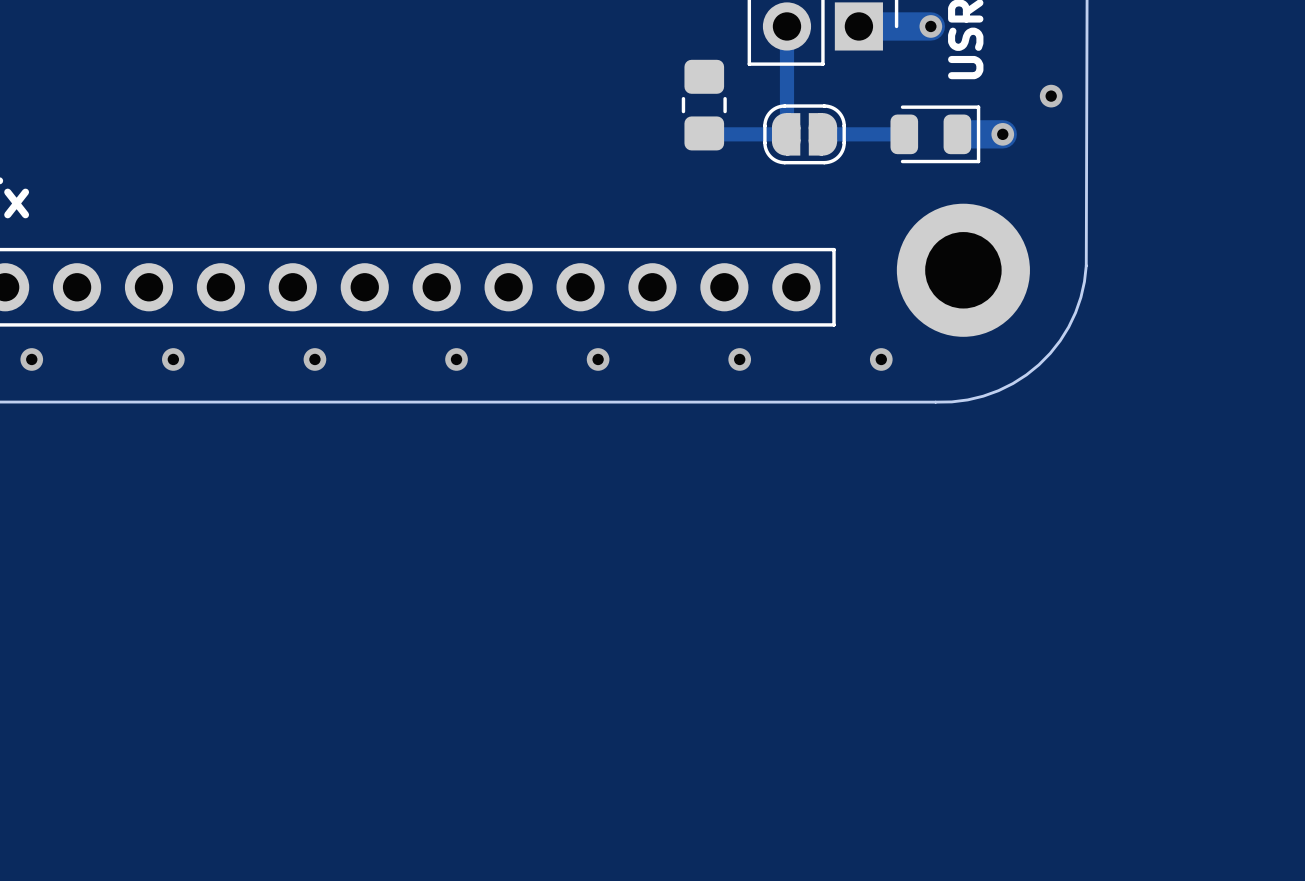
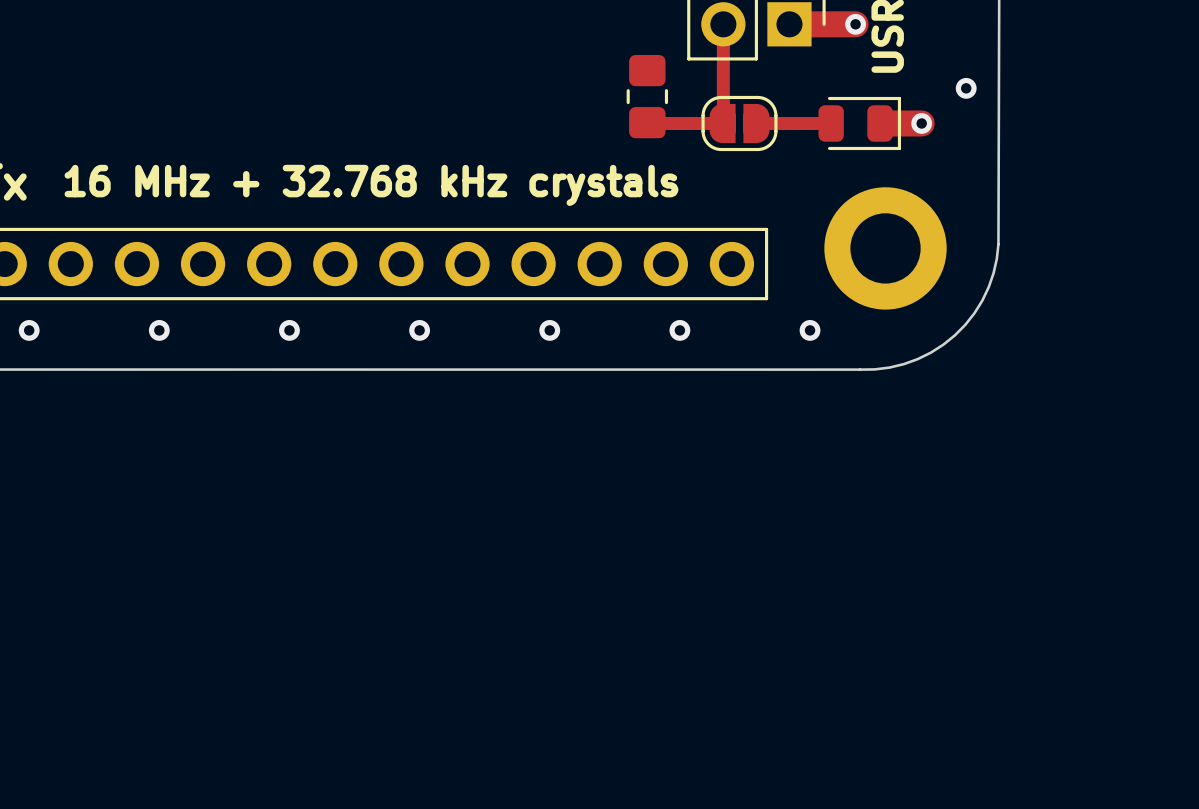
text: none -> 16 MHz + 32.768 kHz crystals (371, 185)

